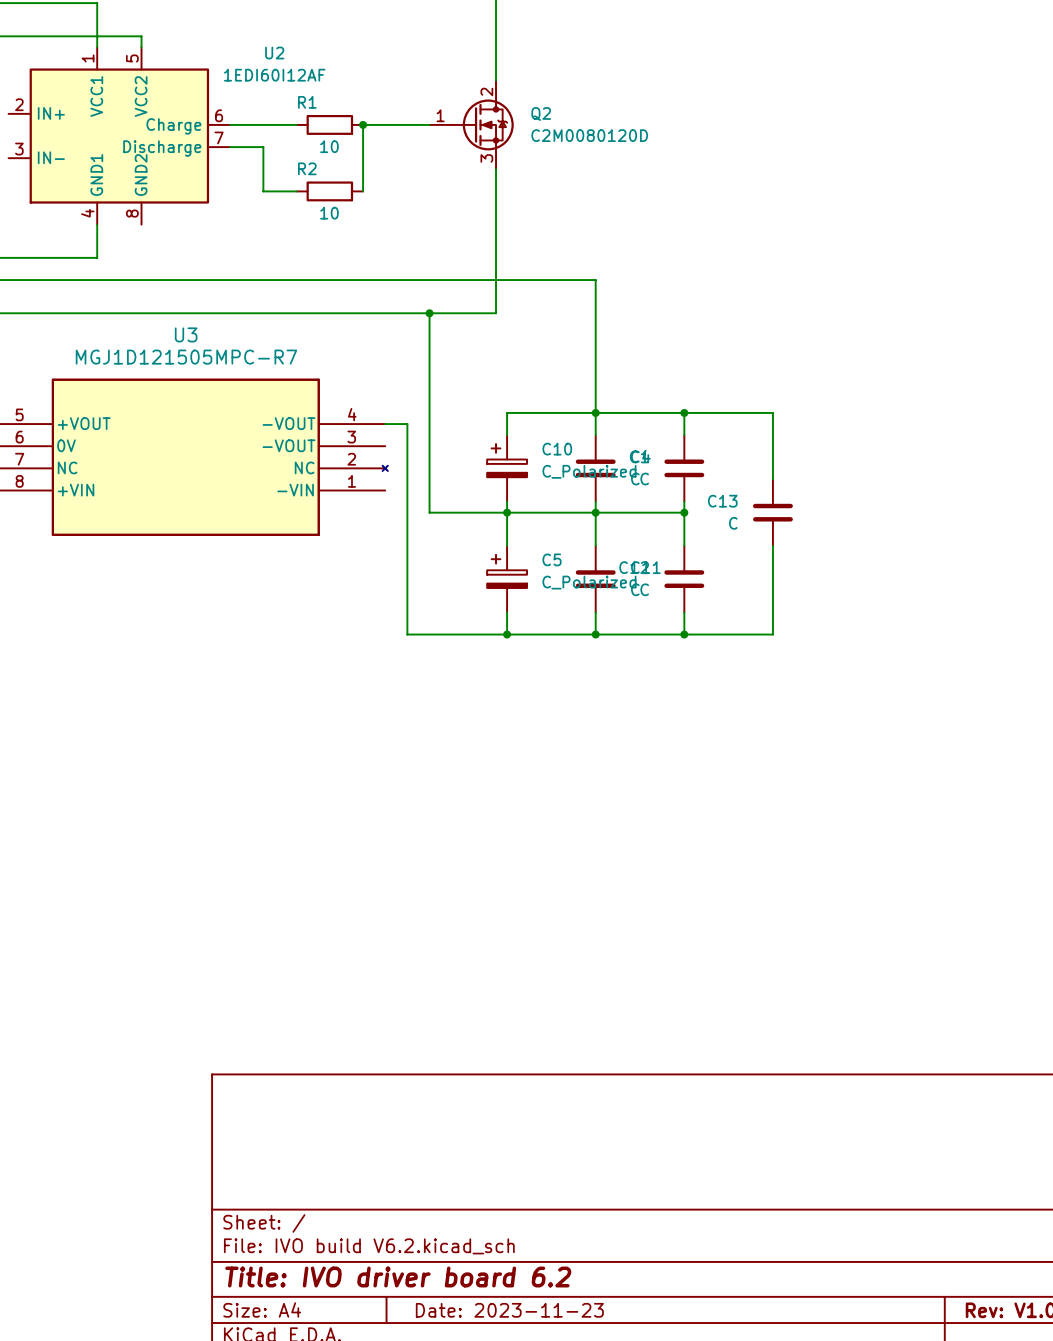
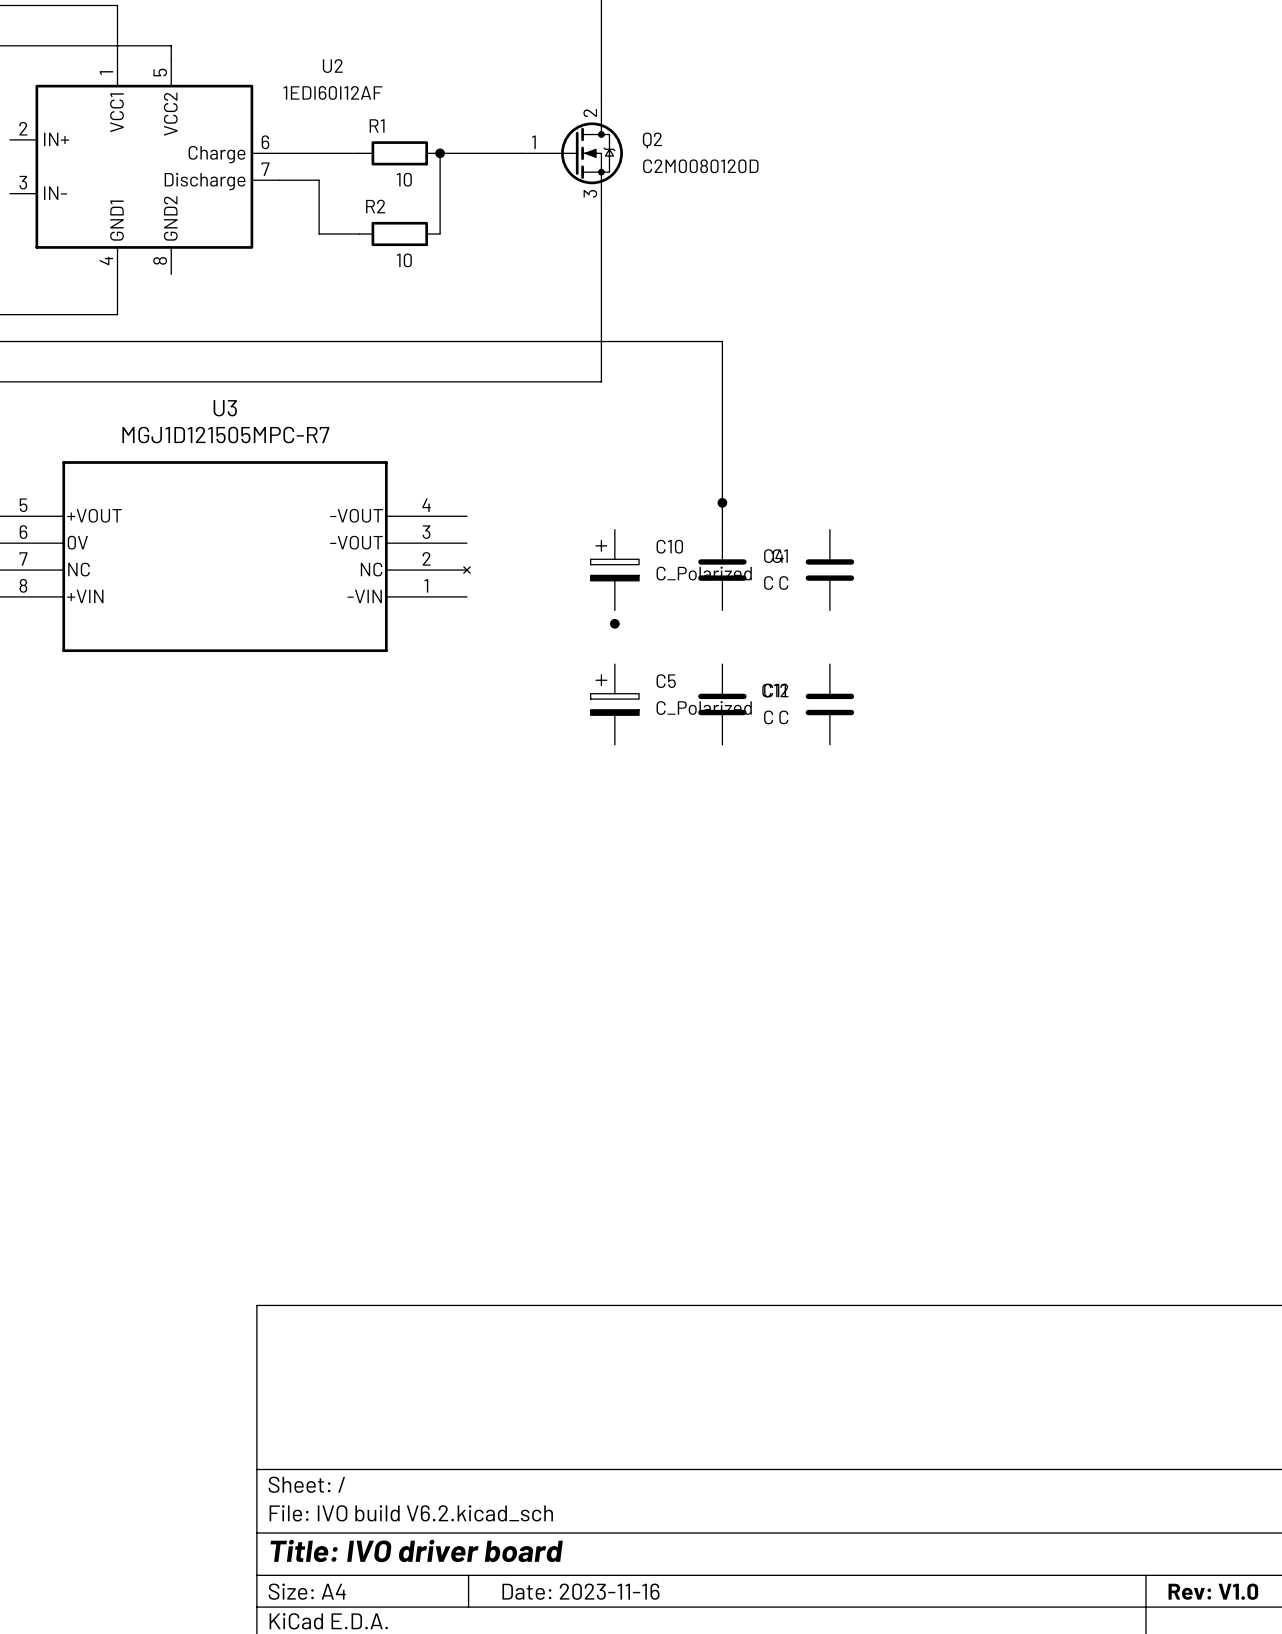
wire: (429, 313) (429, 512) (684, 512) -> none
junction: (429, 313) -> none
wire: (684, 412) (684, 435) -> none
junction: (684, 412) -> none
wire: (385, 424) (407, 424) (407, 634) (772, 634) (772, 545) -> none
wire: (507, 435) (507, 412) (772, 412) (772, 479) -> none
wire: (507, 501) (507, 545) -> none
wire: (595, 501) (595, 545) -> none
wire: (684, 501) (684, 545) -> none
junction: (595, 512) -> none
junction: (684, 512) -> none
C13: C (772, 512) -> none
wire: (507, 612) (507, 634) -> none
wire: (595, 612) (595, 634) -> none
wire: (684, 612) (684, 634) -> none
junction: (507, 634) -> none
junction: (595, 634) -> none
junction: (684, 634) -> none
title block: Title: IVO driver board 6.2 (398, 1277) -> Title: IVO driver board (416, 1550)
title block: Date: 2023-11-23 (509, 1310) -> Date: 2023-11-16 (581, 1591)

